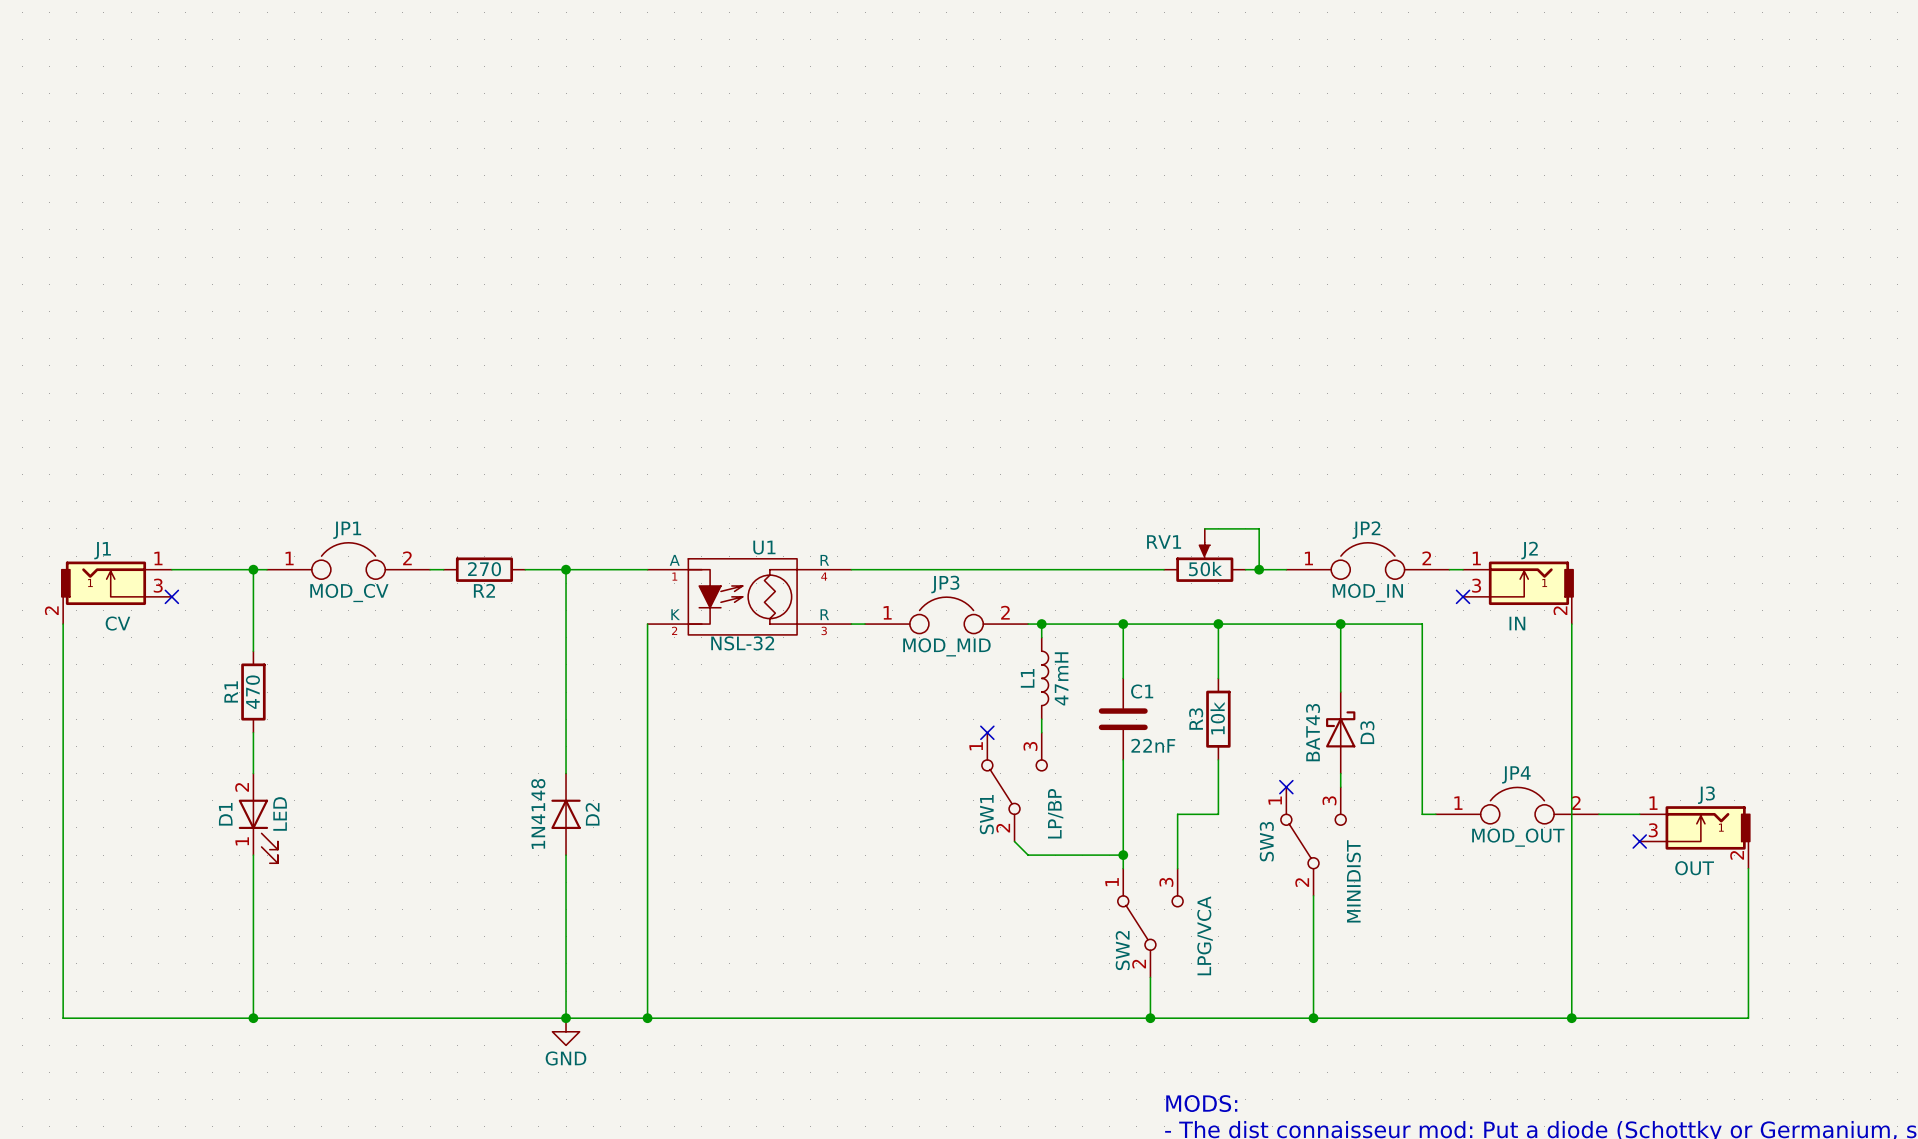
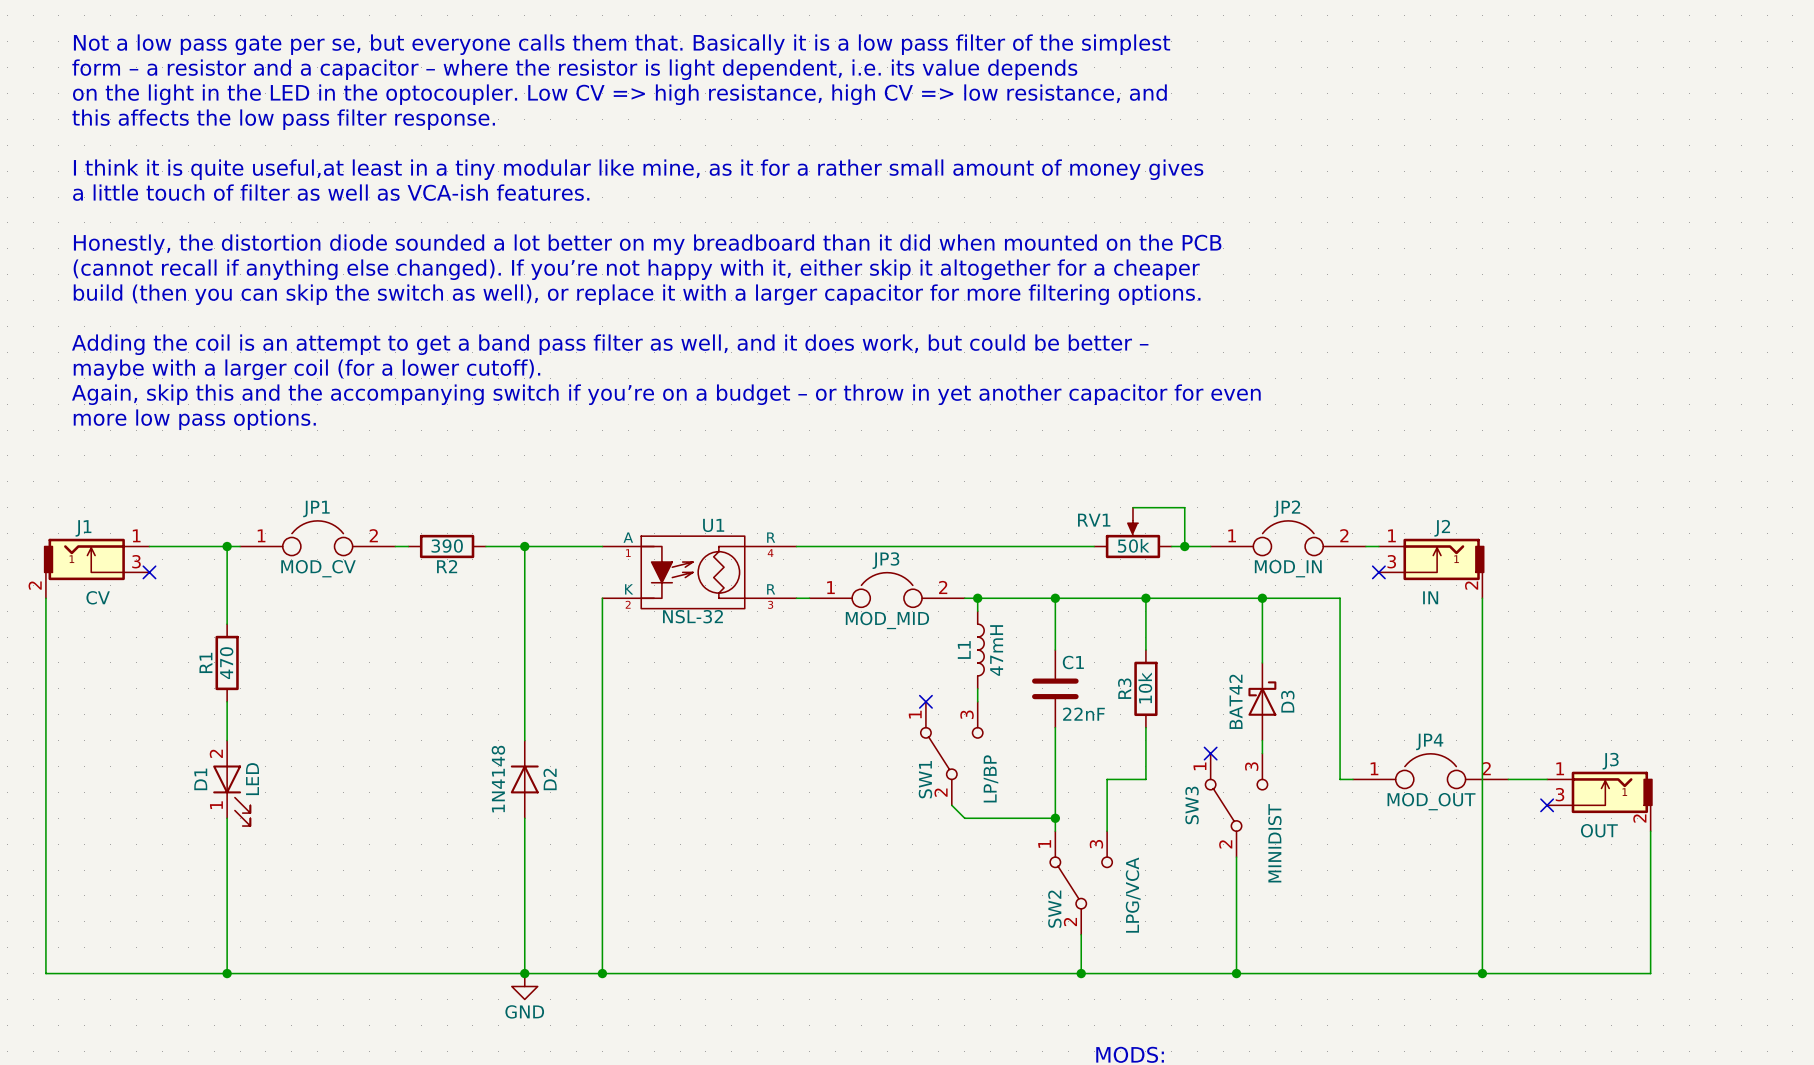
text: none -> Not a low pass gate per se, but everyone calls them that. Basically it is a low pass filter of the simplest (622, 44)
text: none -> form – a resistor and a capacitor – where the resistor is light dependent, i.e. its value depends (574, 69)
text: none -> on the light in the LED in the optocoupler. Low CV => high resistance, high CV => low resistance, and (619, 94)
text: none -> this affects the low pass filter response. (283, 119)
text: none -> I think it is quite useful,at least in a tiny modular like mine, as it for a rather small amount of money gives (638, 169)
text: none -> a little touch of filter as well as VCA-ish features. (331, 192)
text: none -> Honestly, the distortion diode sounded a lot better on my breadboard than it did when mounted on the PCB (647, 244)
text: none -> (cannot recall if anything else changed). If you’re not happy with it, either skip it altogether for a cheaper (636, 269)
text: none -> build (then you can skip the switch as well), or replace it with a larger capacitor for more filtering options. (637, 294)
text: none -> Adding the coil is an attempt to get a band pass filter as well, and it does work, but could be better – (610, 344)
text: none -> maybe with a larger coil (for a lower cutoff). (306, 369)
text: none -> Again, skip this and the accompanying switch if you’re on a budget – or throw in yet another capacitor for even (666, 394)
text: none -> more low pass options. (194, 419)
R2 value: 270 (484, 569) -> 390 (447, 546)
D3 value: BAT43 (1313, 732) -> BAT42 (1235, 701)

